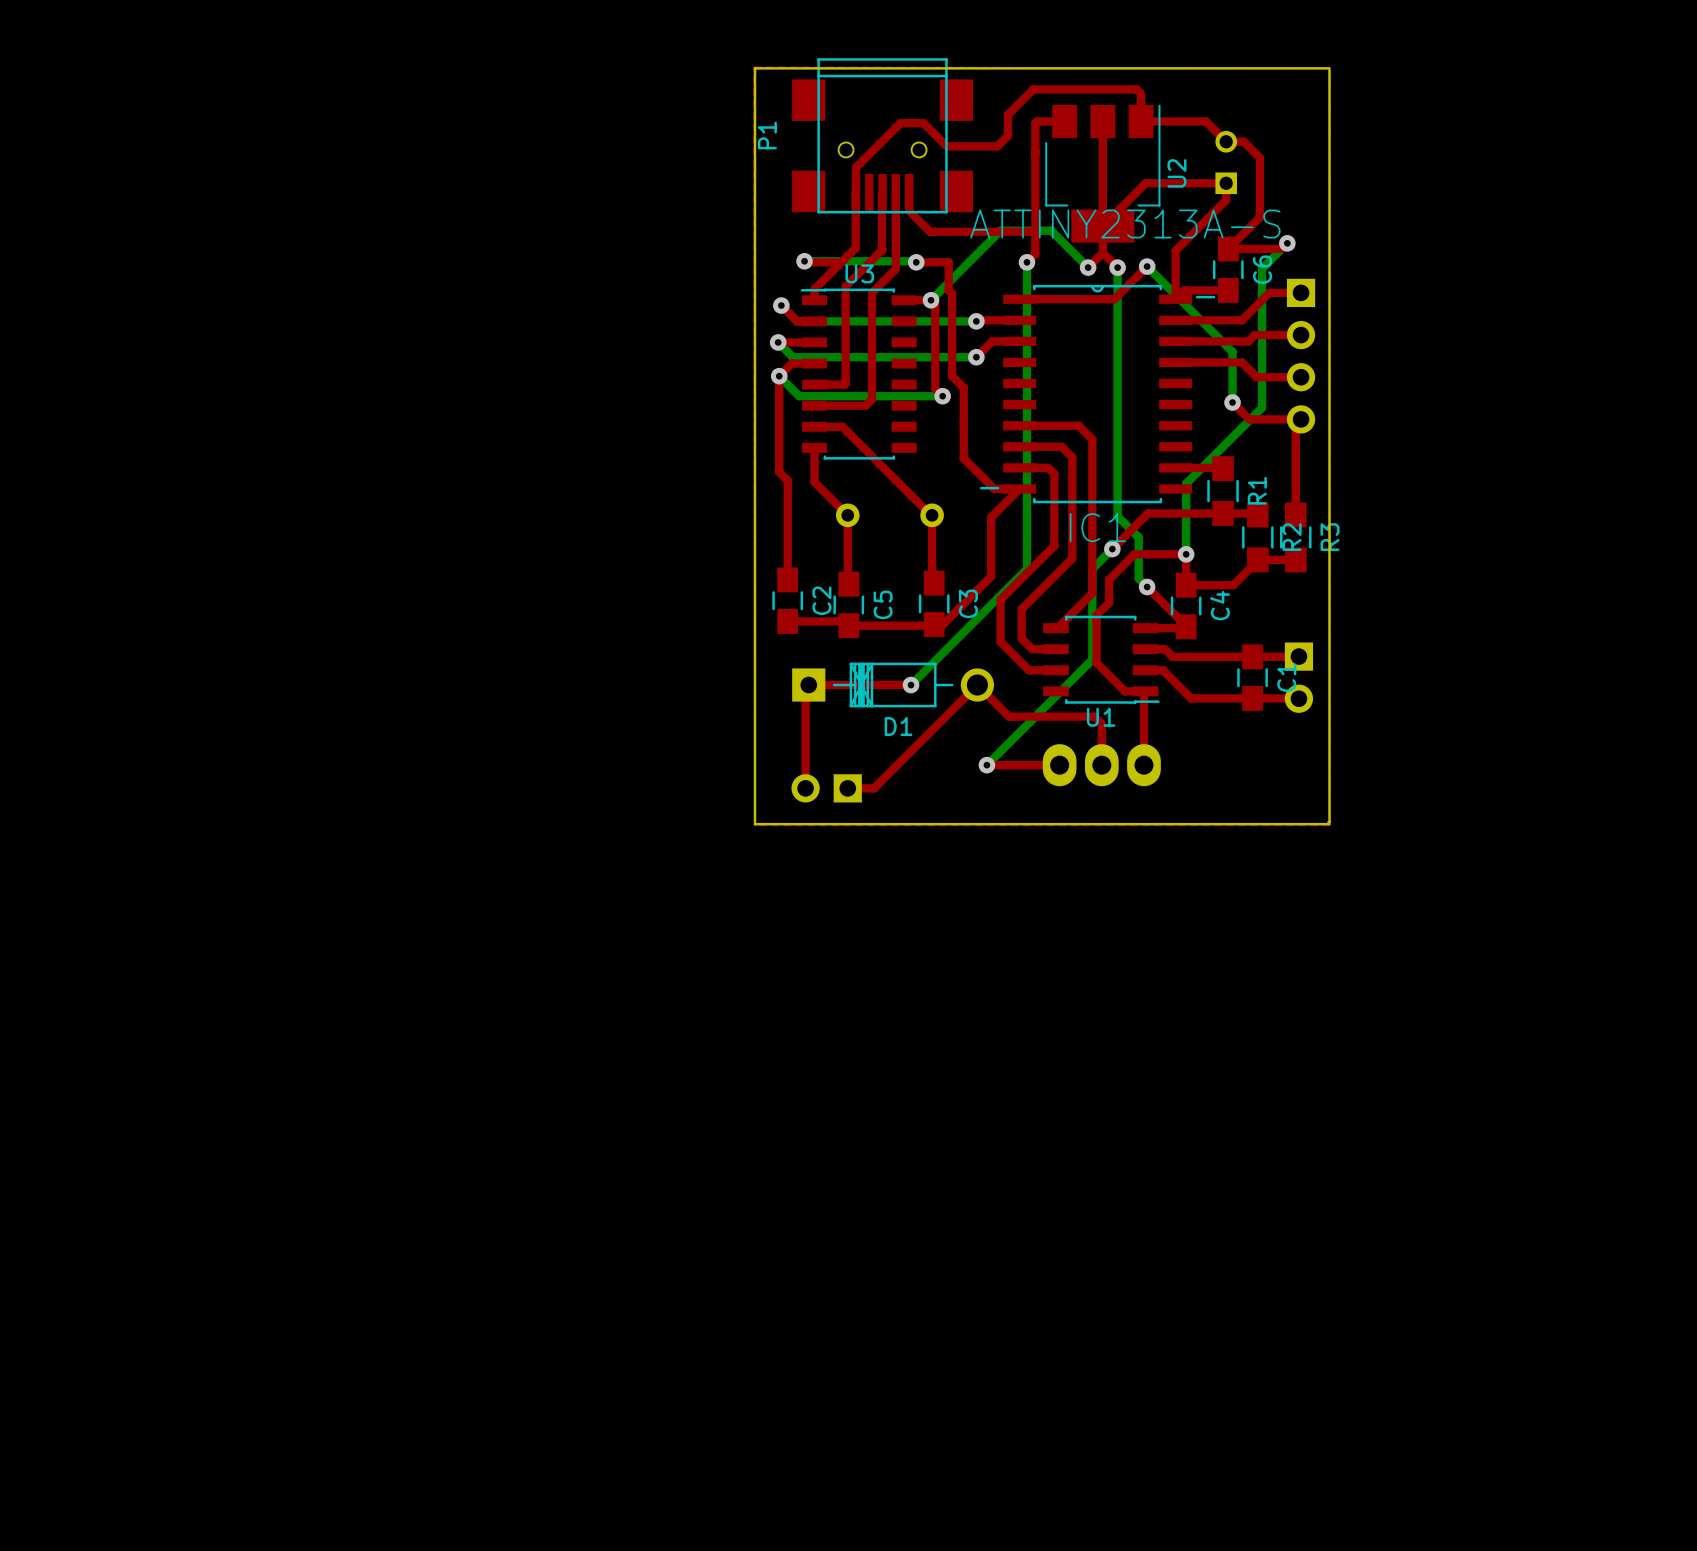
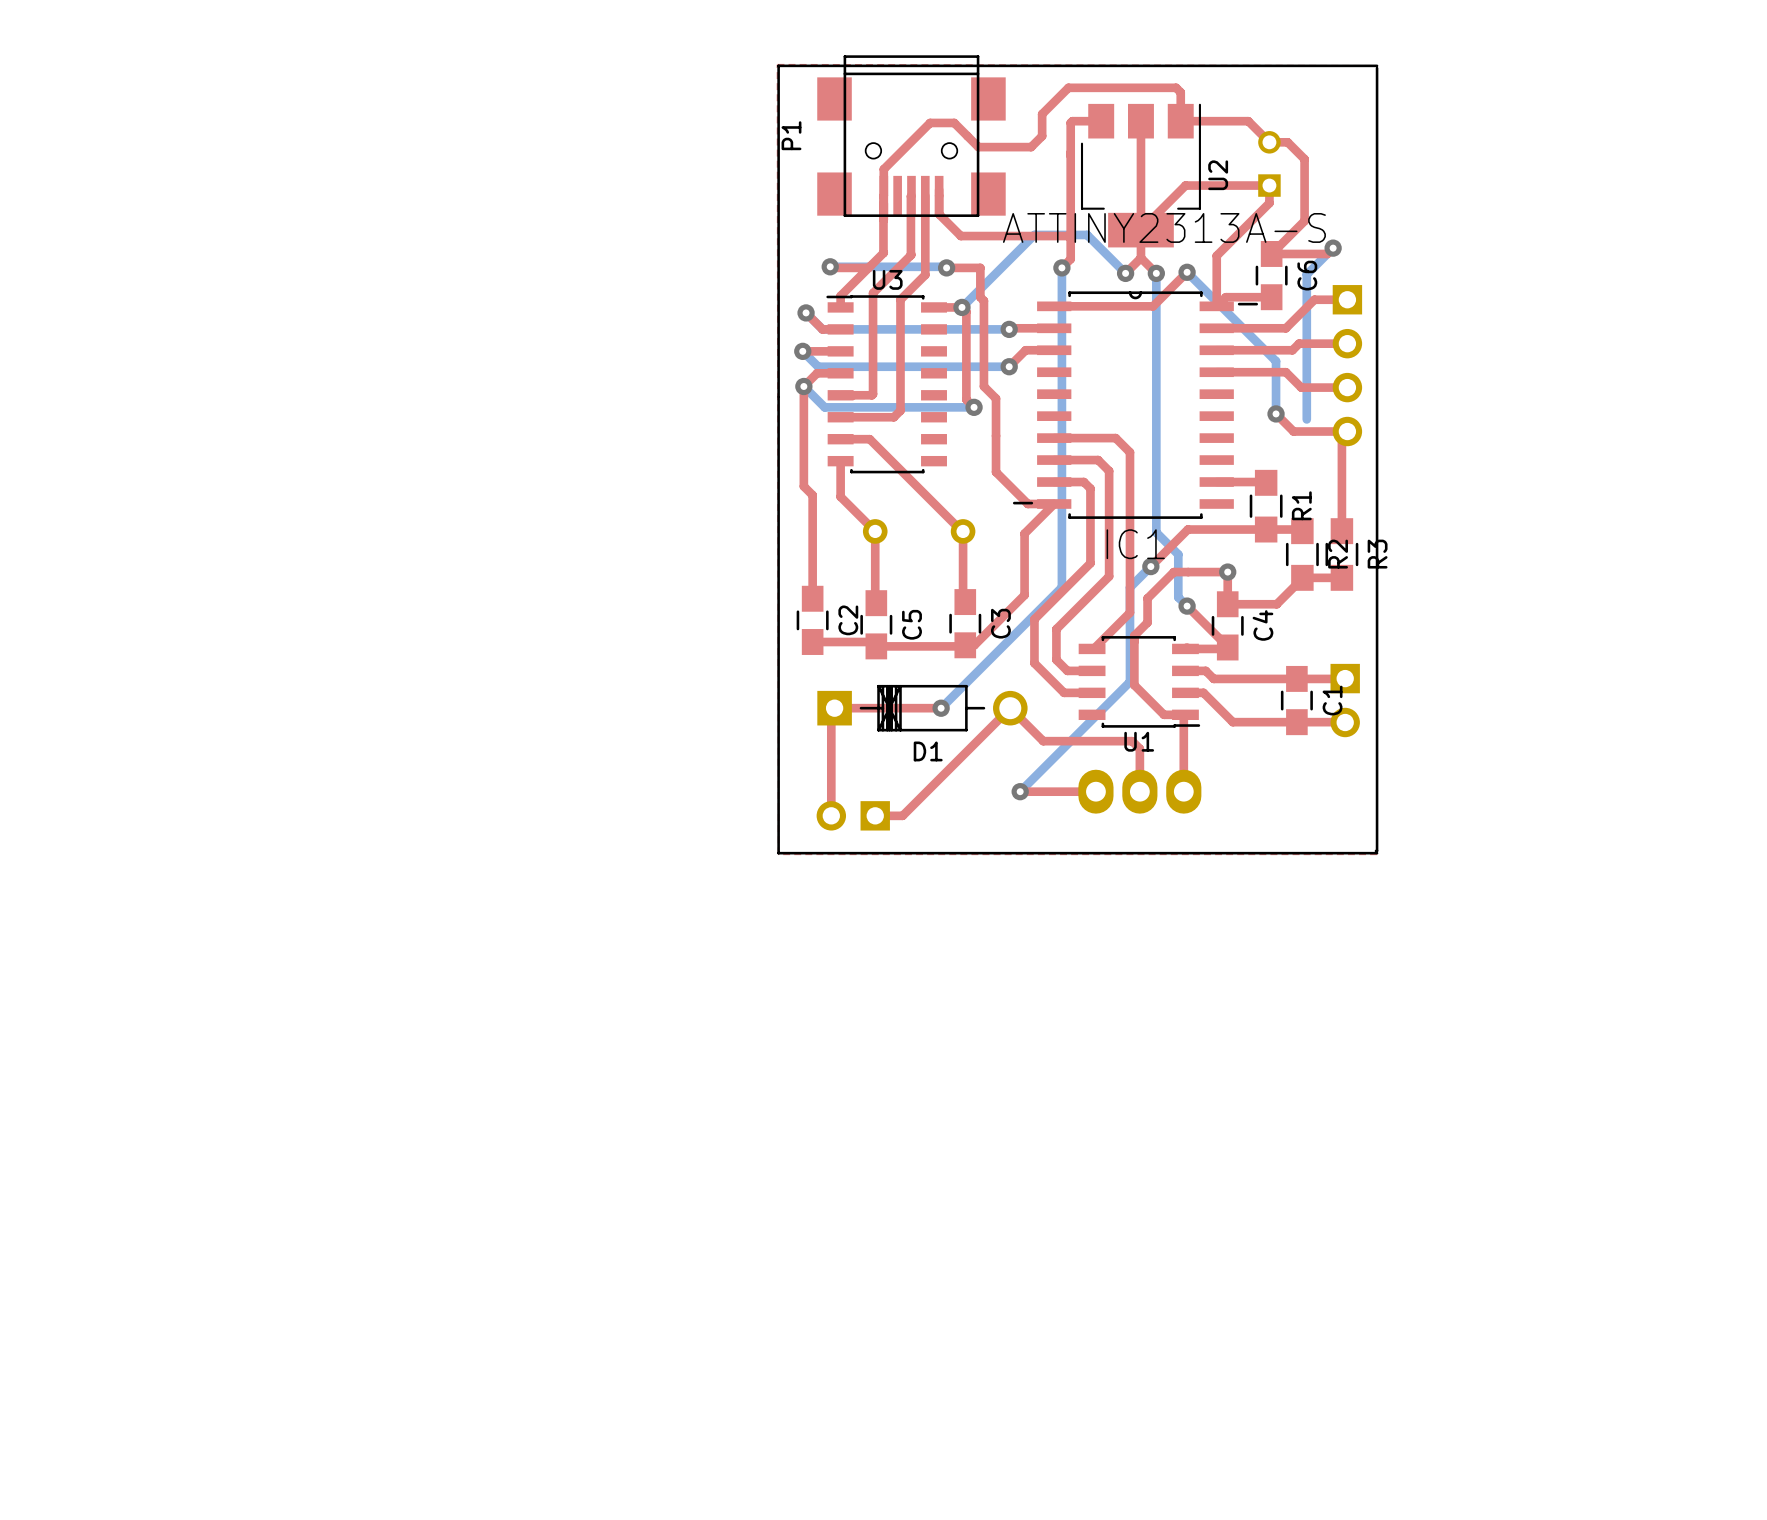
bottom track: (1262, 407) (1186, 483) (1186, 554) -> none

